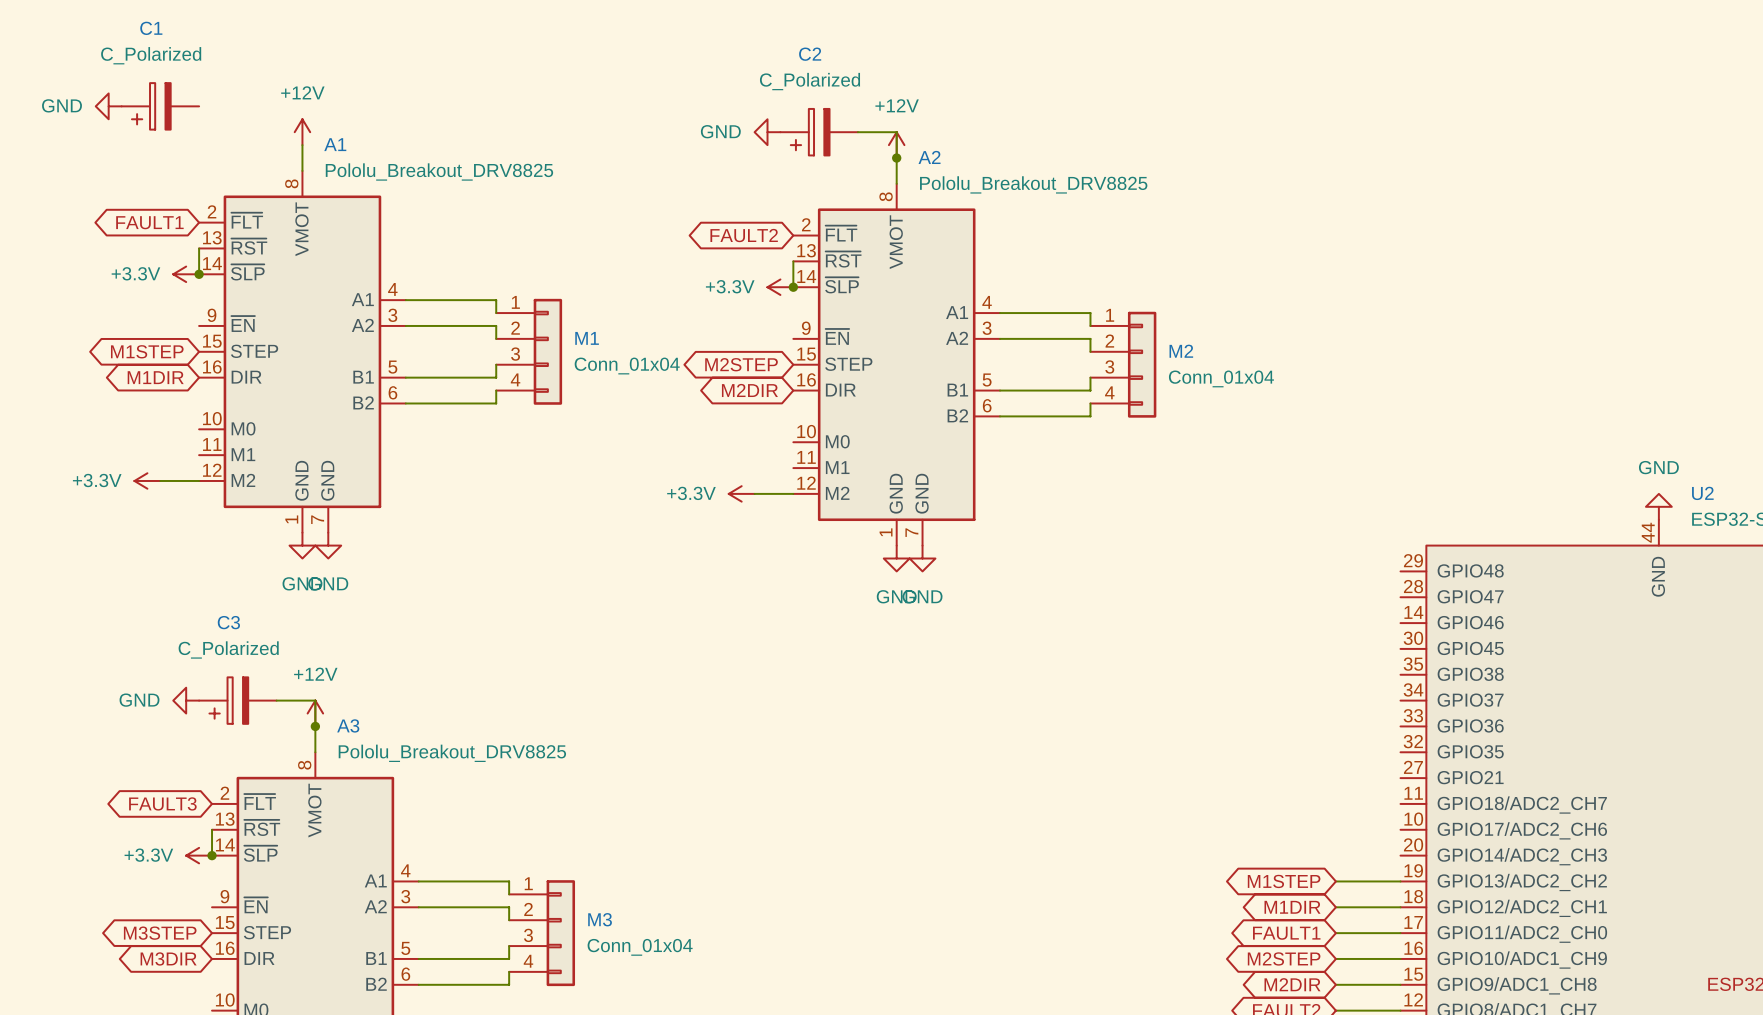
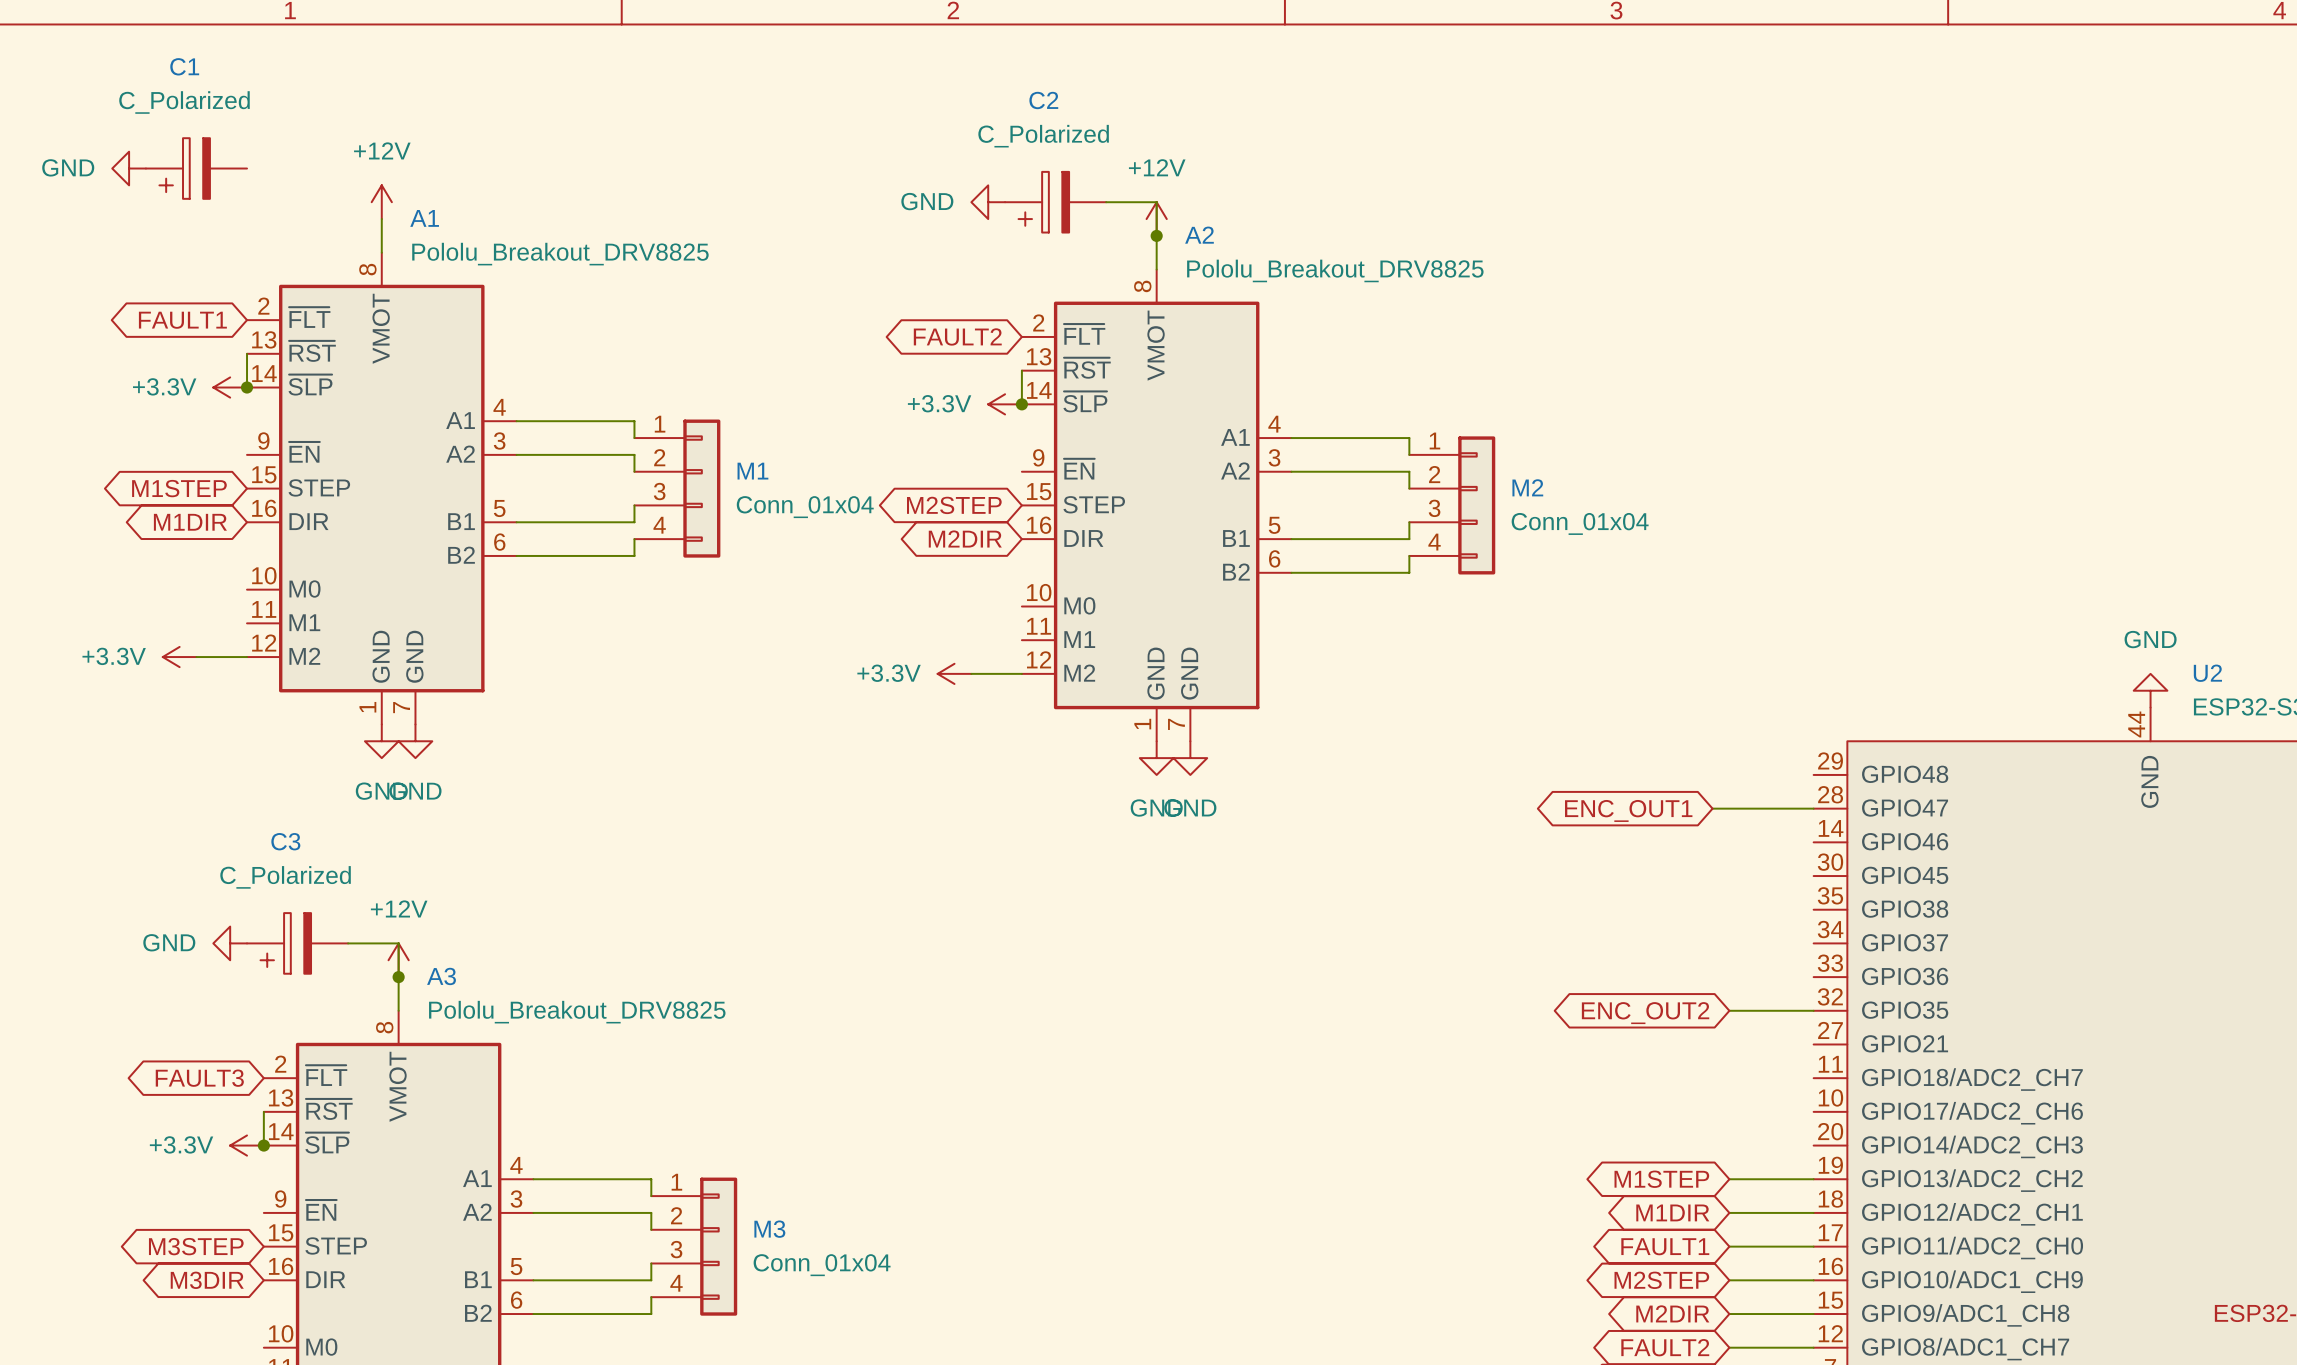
wire: none -> (1712, 808) (1813, 808)
global label: none -> ENC_OUT1 (1628, 810)
wire: none -> (1729, 1010) (1813, 1010)
global label: none -> ENC_OUT2 (1645, 1013)

